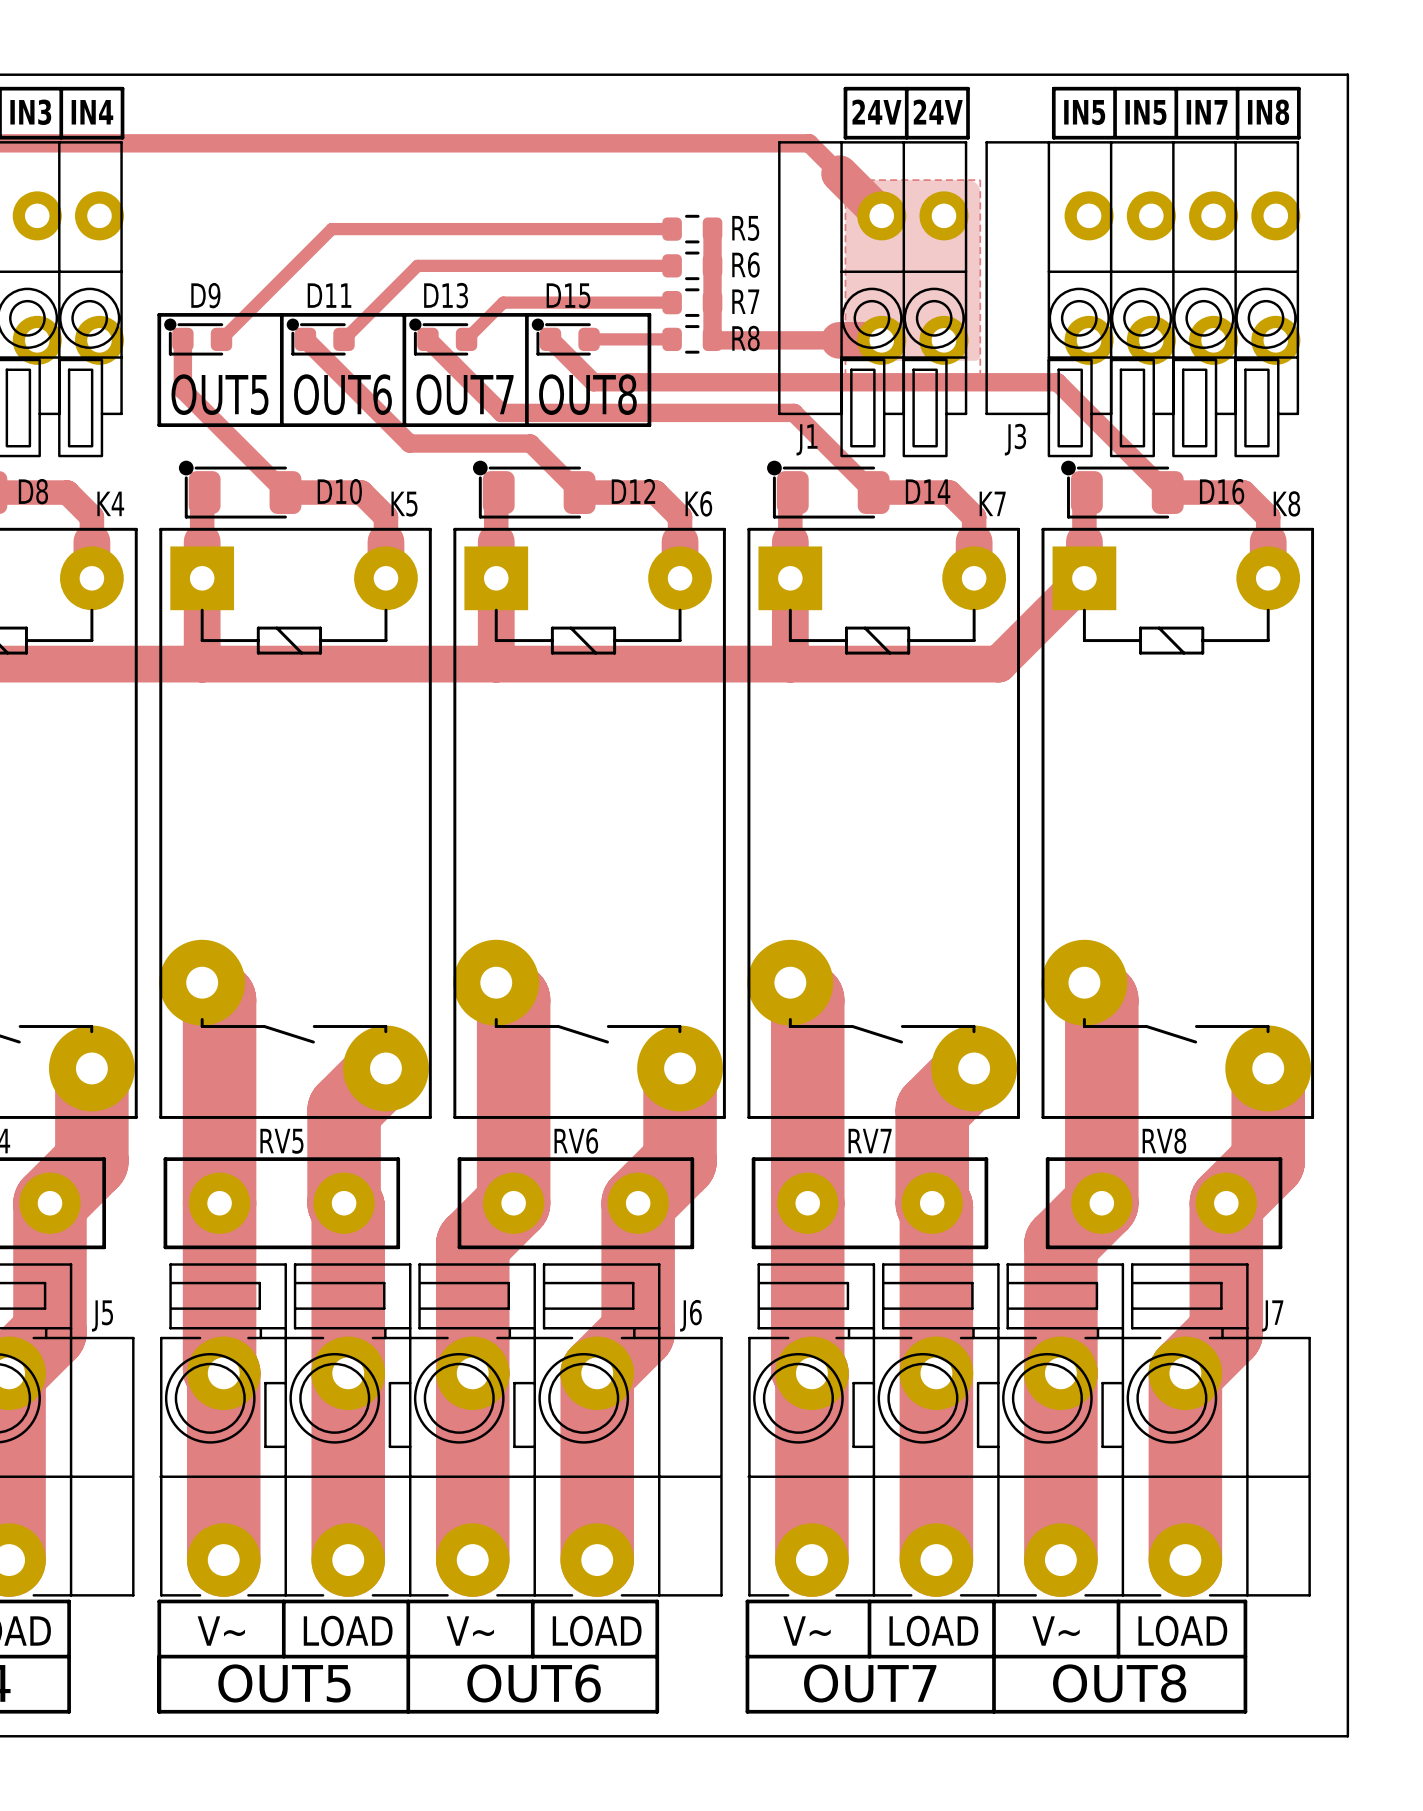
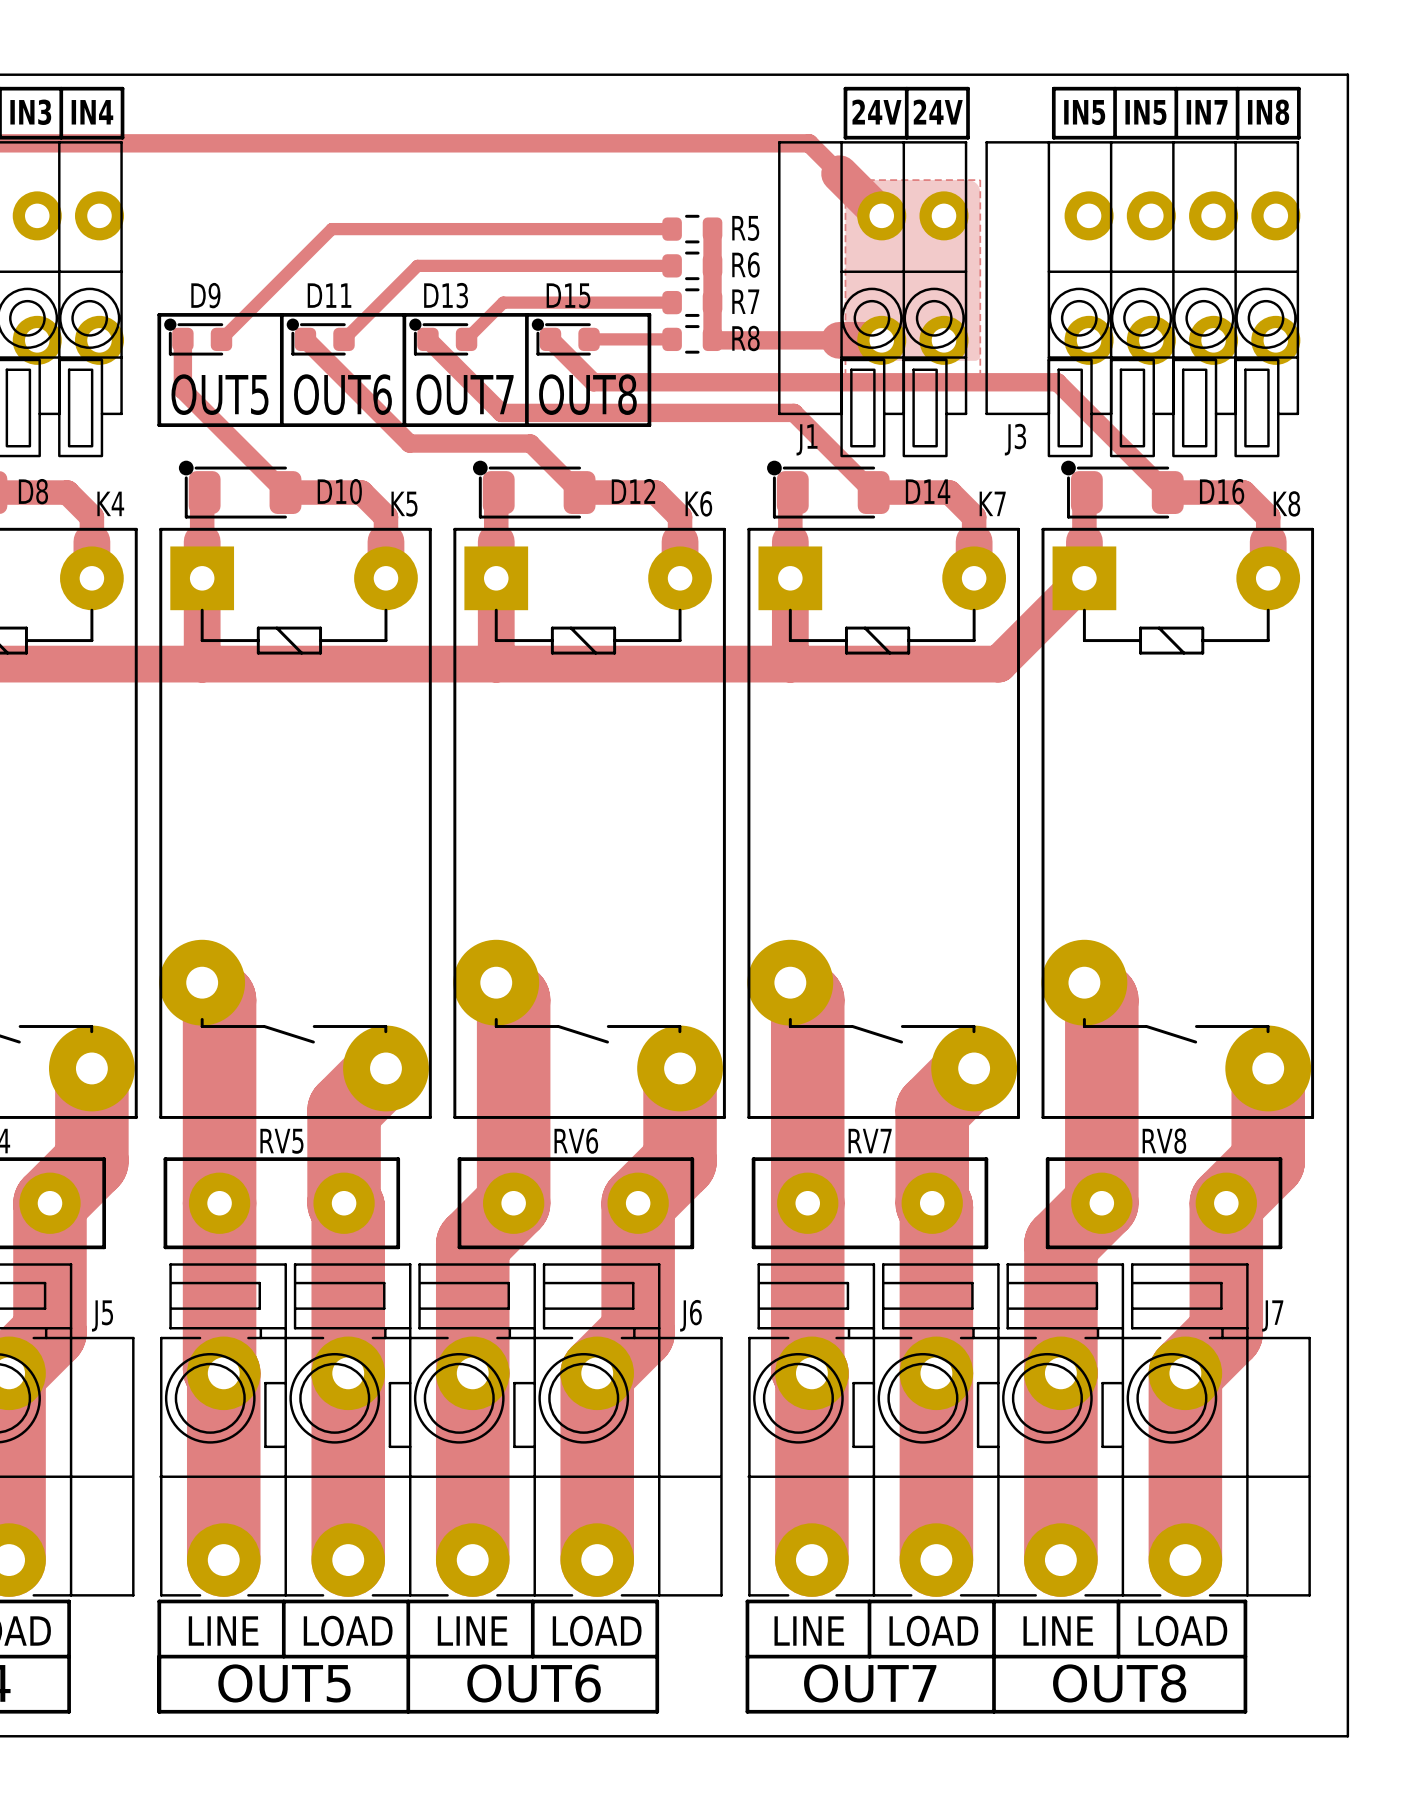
text: V~ (221, 1631) -> LINE (223, 1631)
text: V~ (470, 1631) -> LINE (472, 1631)
text: V~ (807, 1631) -> LINE (809, 1631)
text: V~ (1056, 1631) -> LINE (1058, 1631)

